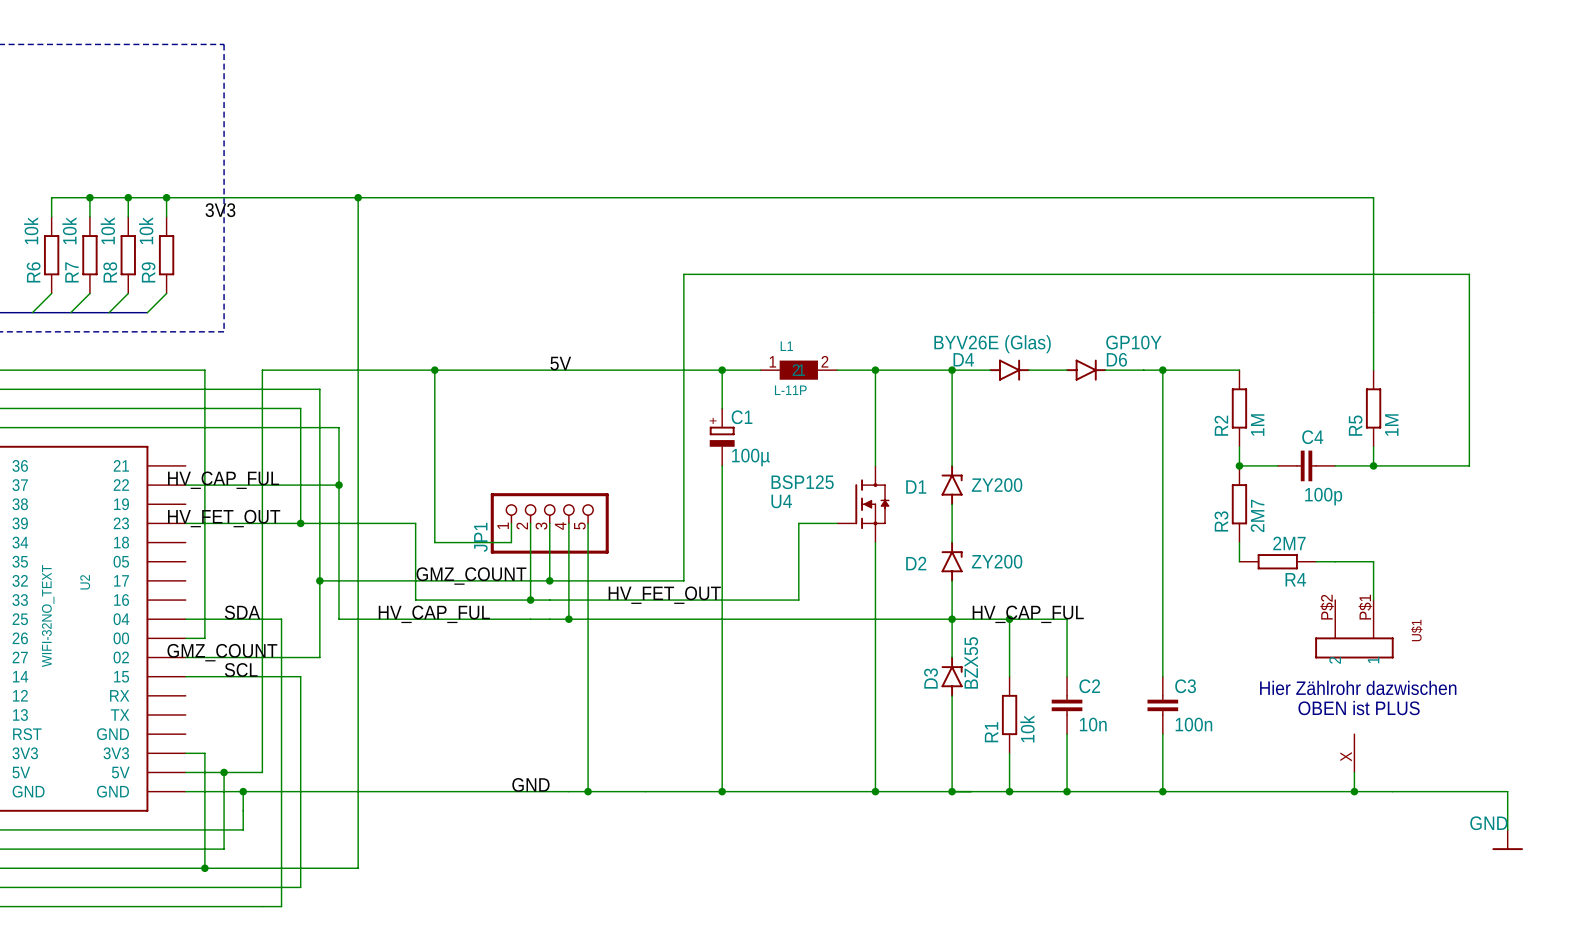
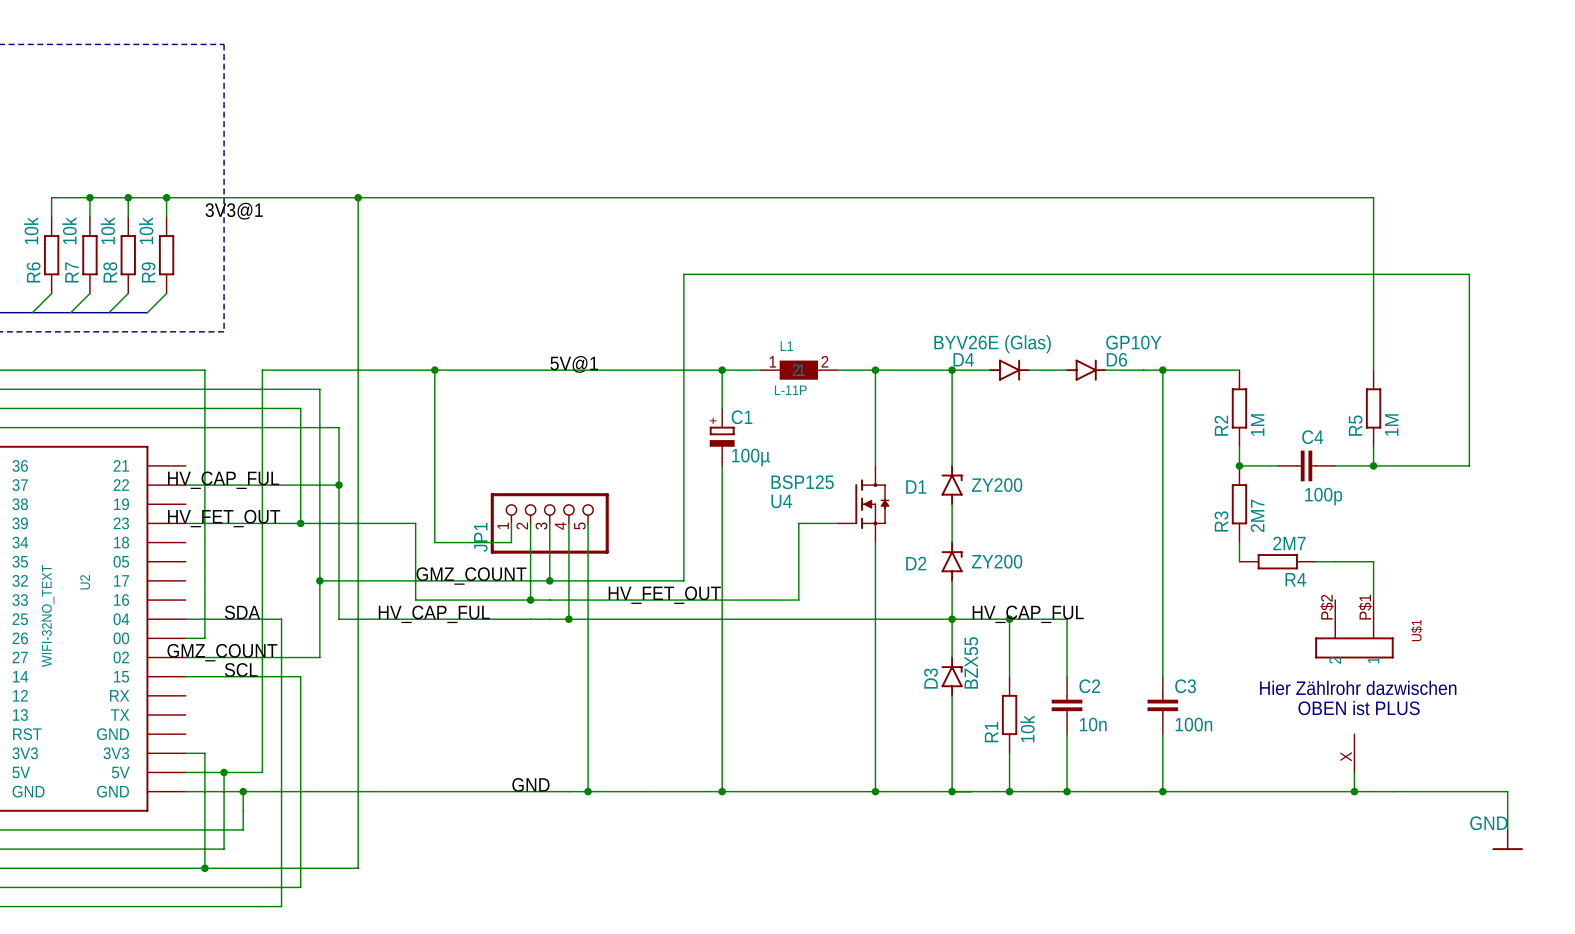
label: 3V3 (220, 210) -> 3V3@1 (234, 211)
label: 5V (560, 363) -> 5V@1 (574, 364)

